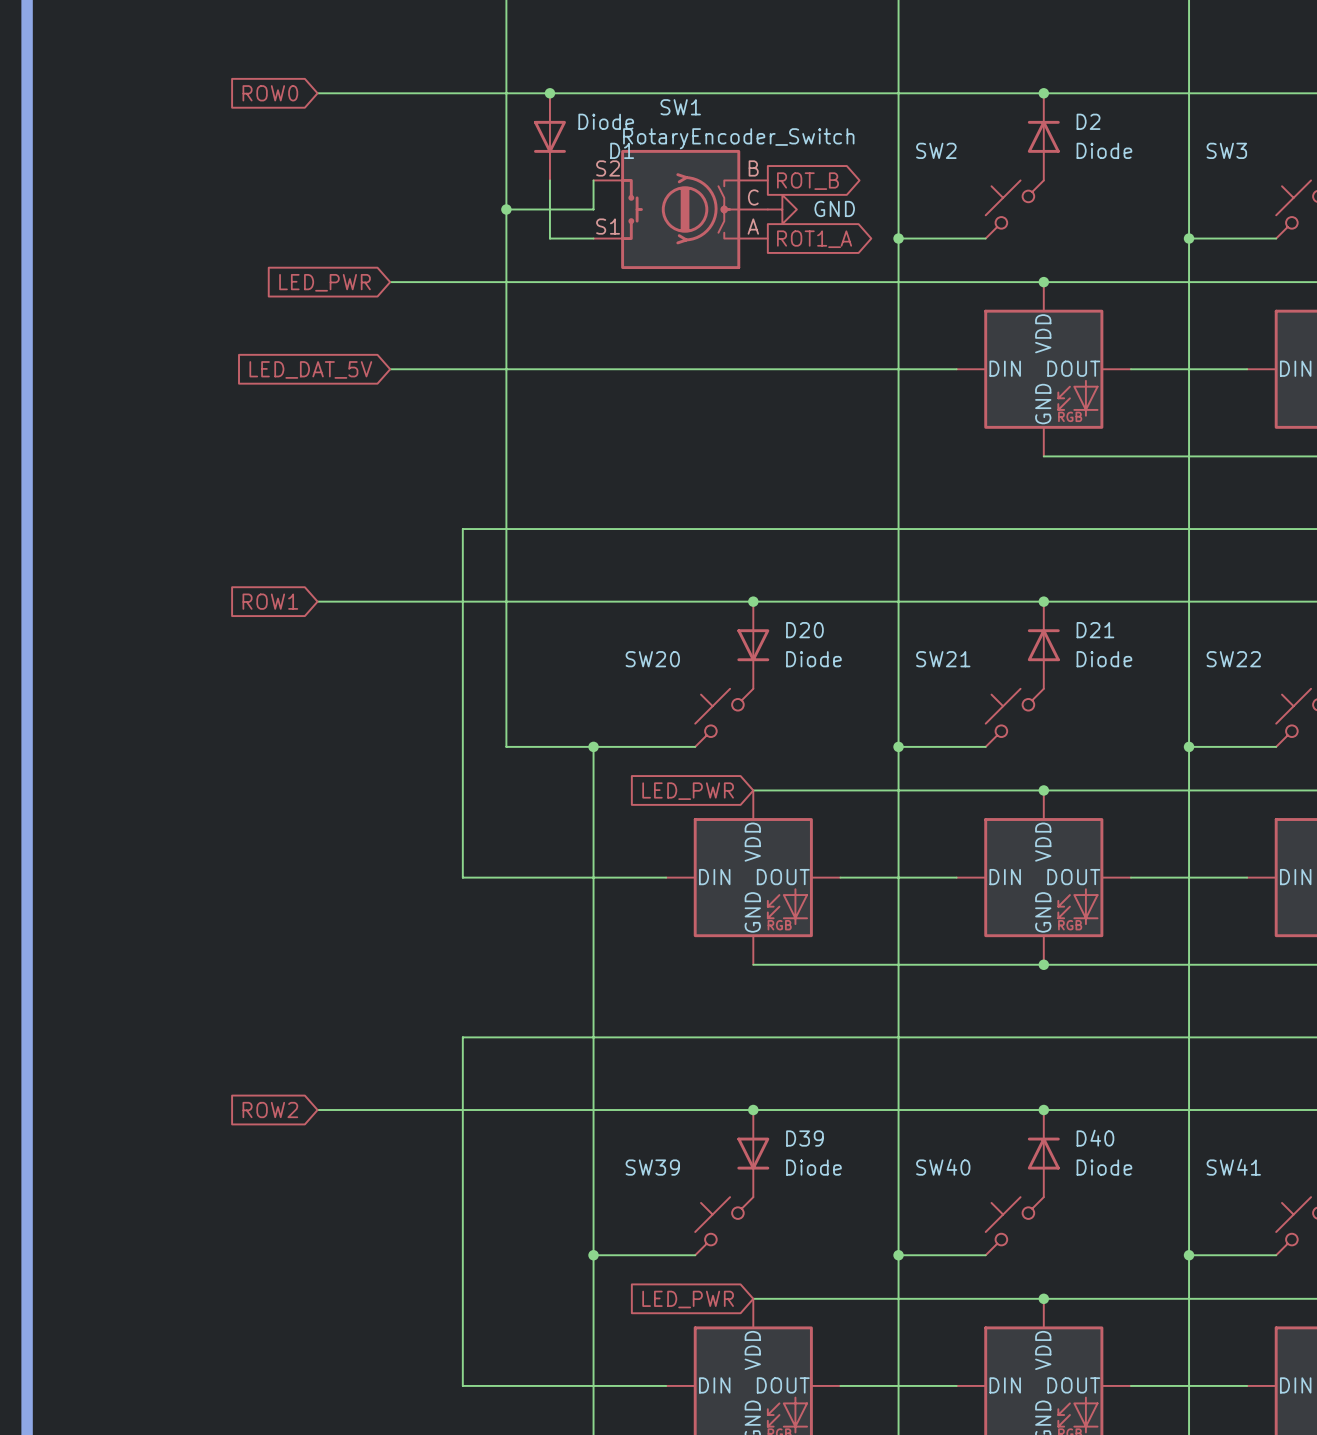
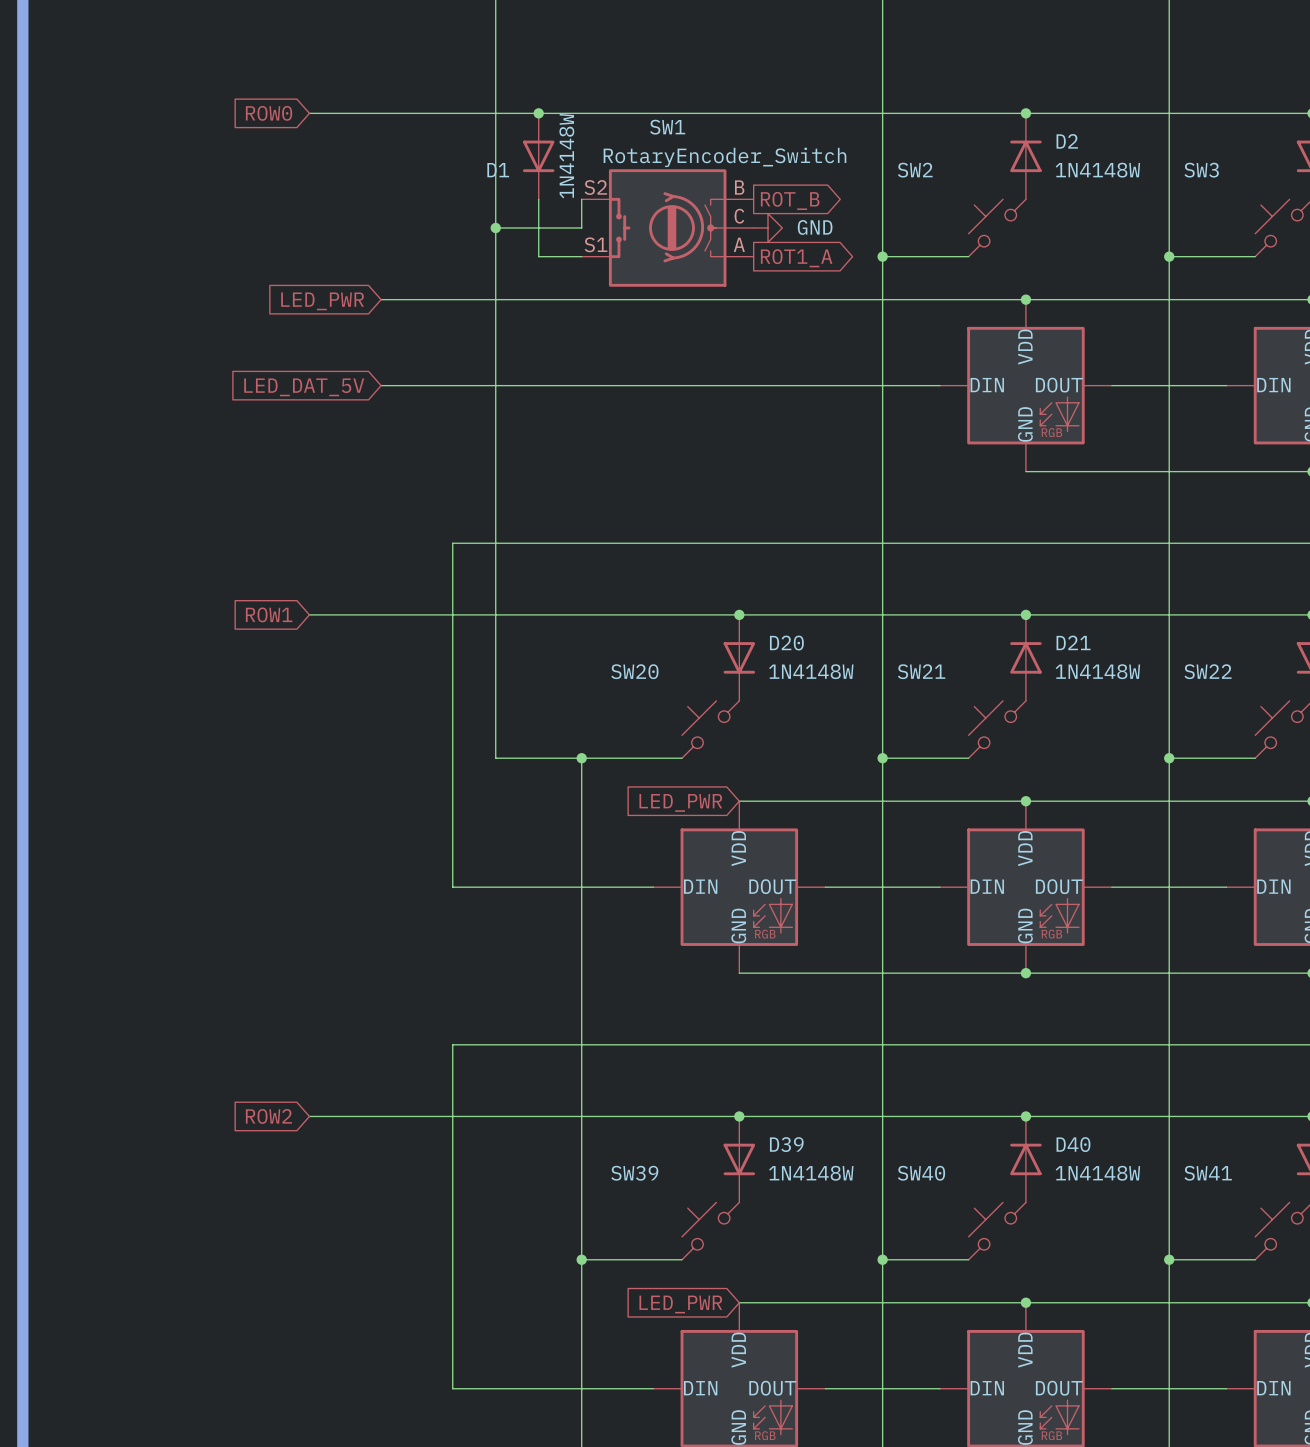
D1 value: Diode (606, 121) -> 1N4148W (566, 156)
D1 name position: D1 (622, 150) -> D1 (498, 170)
D2 value: Diode (1104, 150) -> 1N4148W (1097, 170)
D20 value: Diode (813, 659) -> 1N4148W (811, 671)
D21 value: Diode (1104, 659) -> 1N4148W (1097, 671)
D39 value: Diode (813, 1167) -> 1N4148W (811, 1173)
D40 value: Diode (1104, 1167) -> 1N4148W (1097, 1173)

